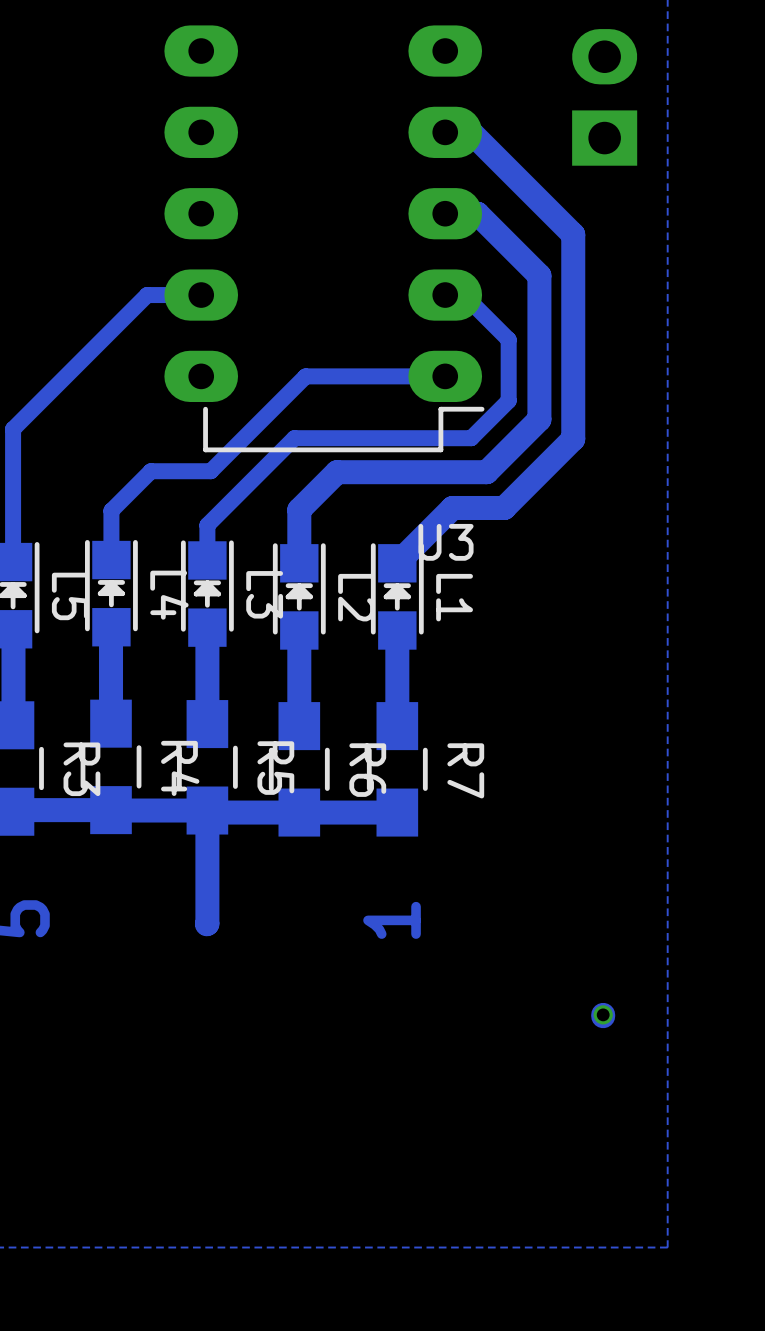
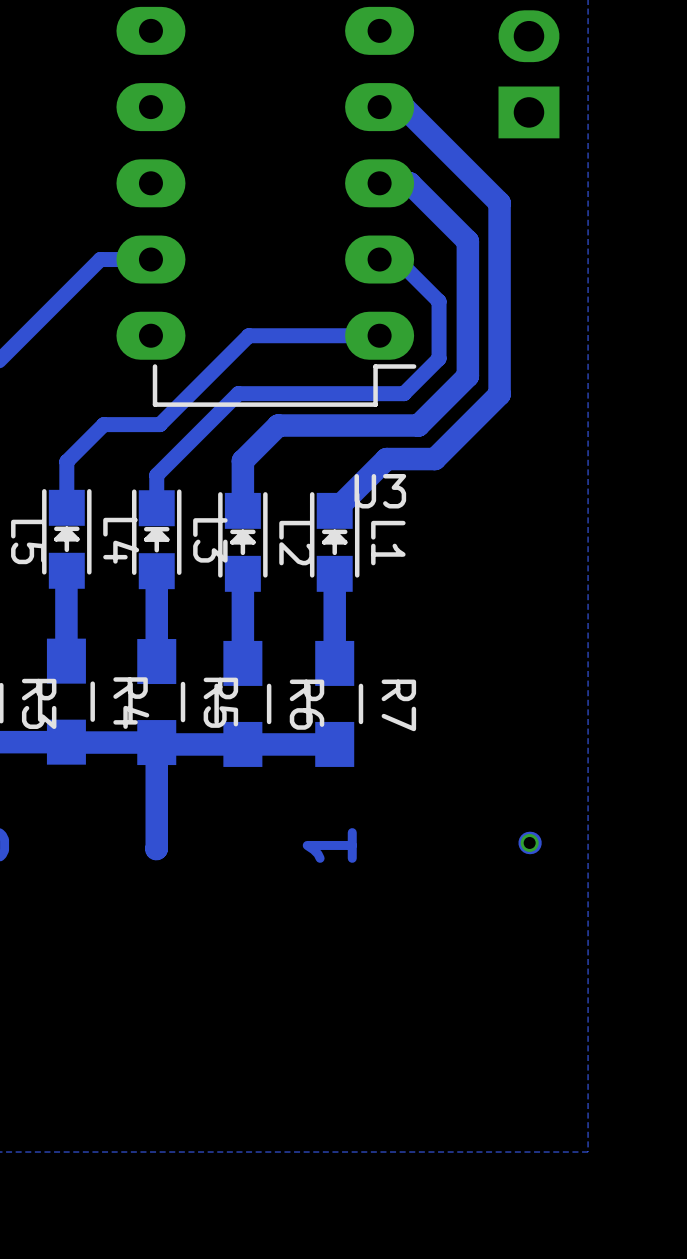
track: none -> (530, 842) (529, 842)
track: (603, 1014) (603, 1016) -> none
via position: (603, 1014) -> (529, 842)

